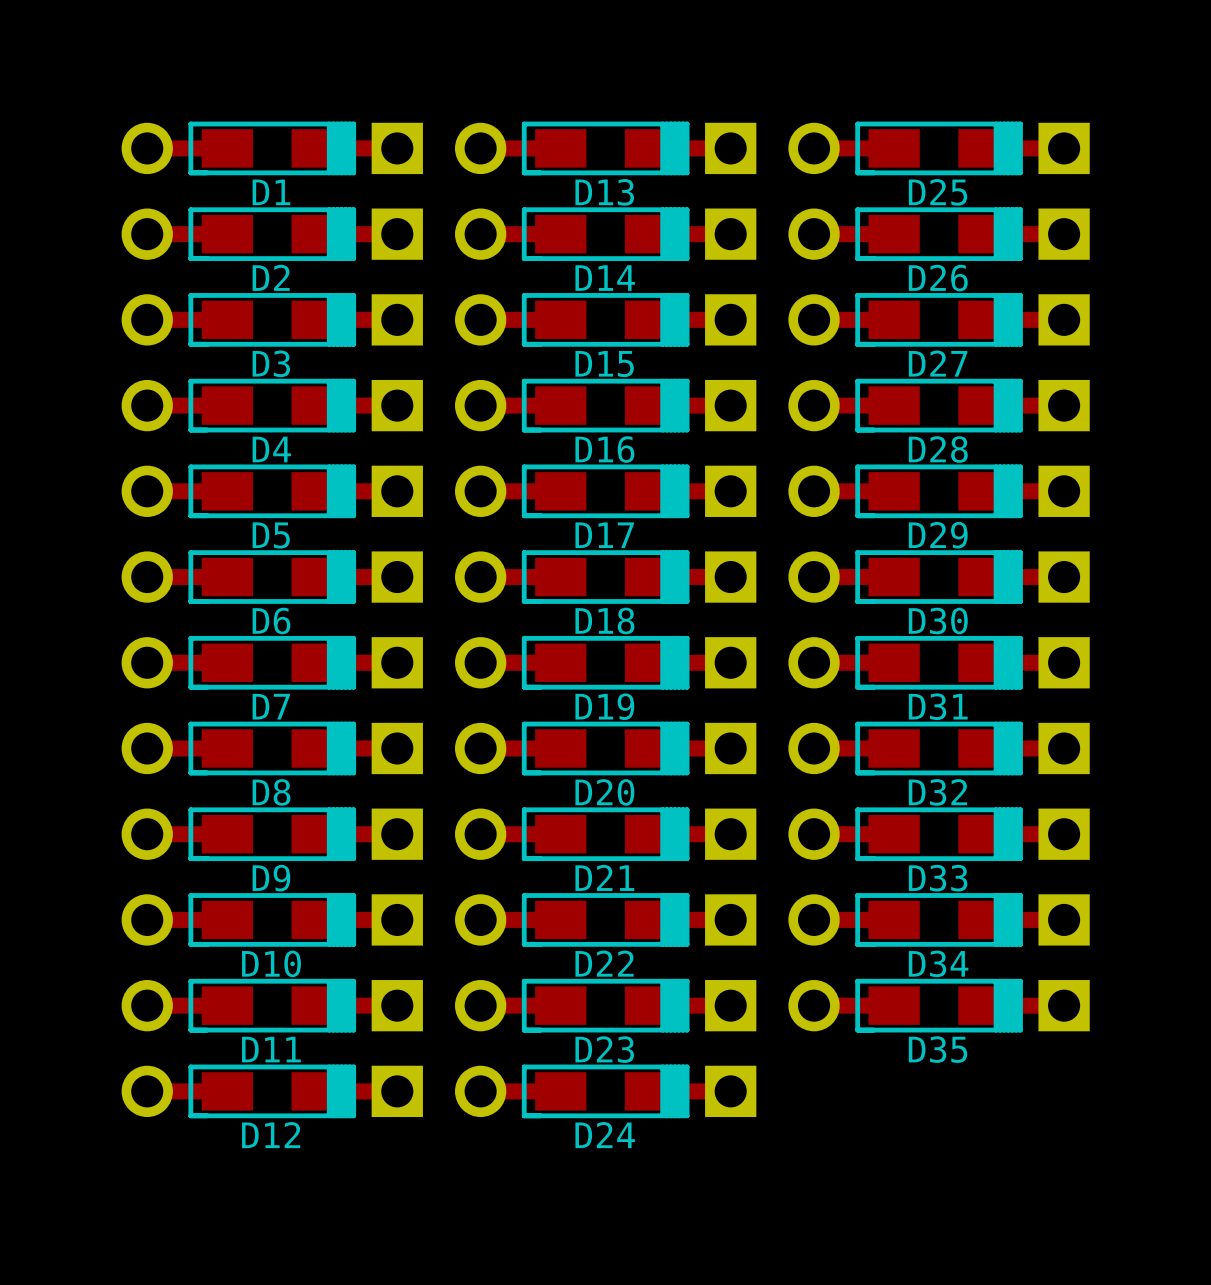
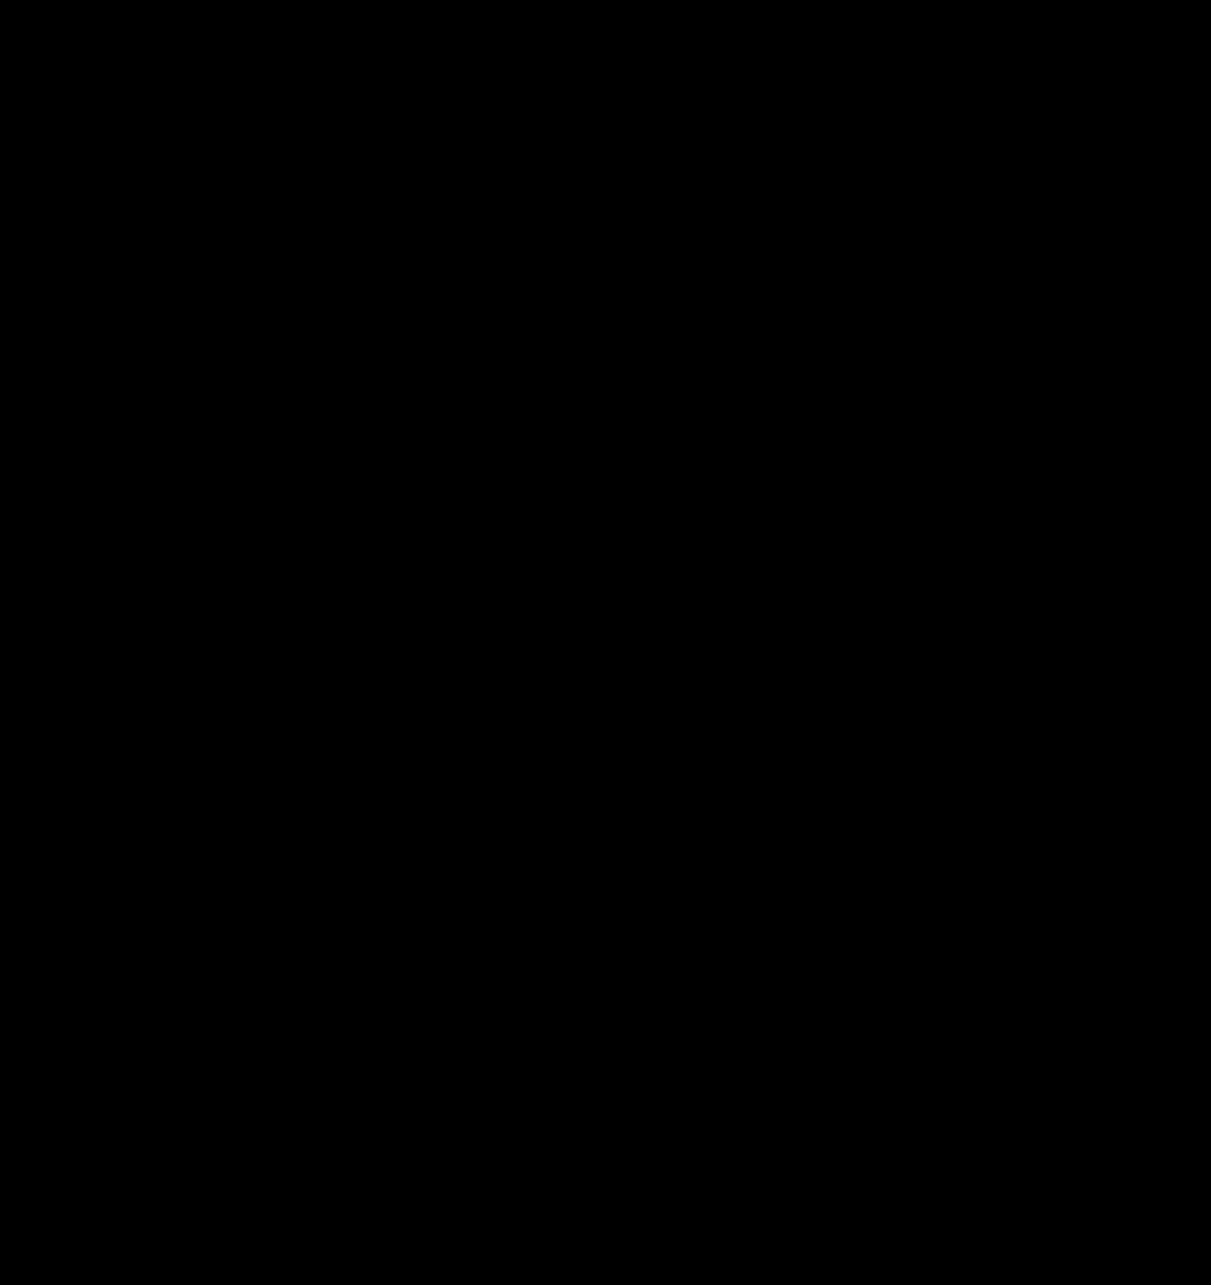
D1: (272, 148) -> none
D13: (605, 148) -> none
D25: (939, 148) -> none
D2: (272, 234) -> none
D14: (605, 234) -> none
D26: (939, 234) -> none
D3: (272, 319) -> none
D15: (605, 319) -> none
D27: (939, 319) -> none
D4: (272, 405) -> none
D16: (605, 405) -> none
D28: (939, 405) -> none
D5: (272, 491) -> none
D17: (605, 491) -> none
D29: (939, 491) -> none
D6: (272, 577) -> none
D18: (605, 577) -> none
D30: (939, 577) -> none
D7: (272, 662) -> none
D19: (605, 662) -> none
D31: (939, 662) -> none
D8: (272, 748) -> none
D20: (605, 748) -> none
D32: (939, 748) -> none
D9: (272, 834) -> none
D21: (605, 834) -> none
D33: (939, 834) -> none
D10: (272, 919) -> none
D22: (605, 919) -> none
D34: (939, 919) -> none
D11: (272, 1005) -> none
D23: (605, 1005) -> none
D35: (939, 1005) -> none
D12: (272, 1091) -> none
D24: (605, 1091) -> none

